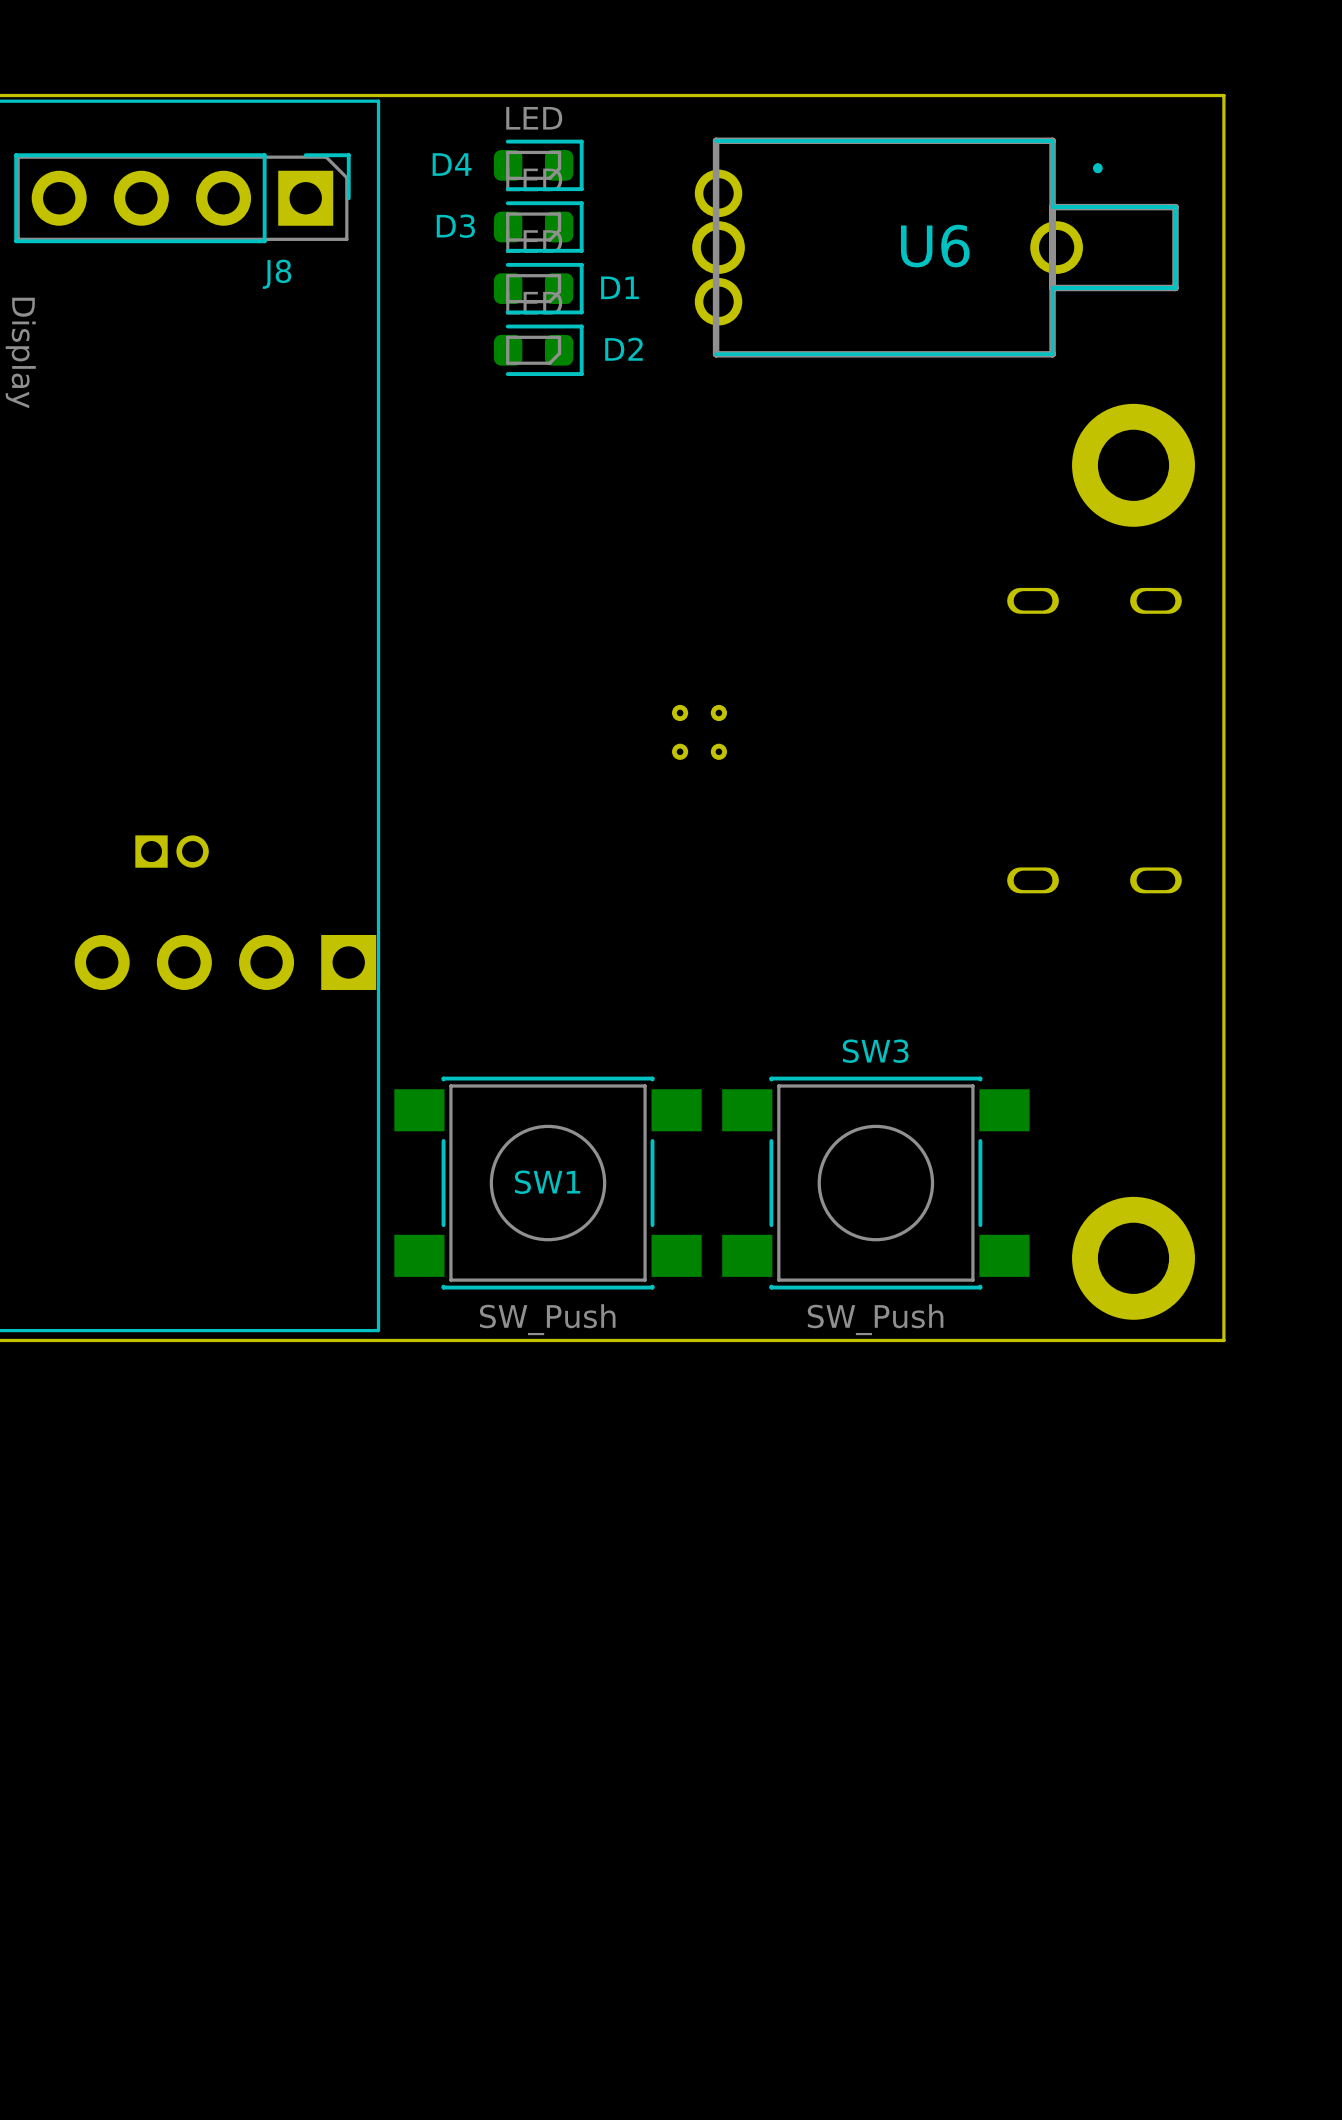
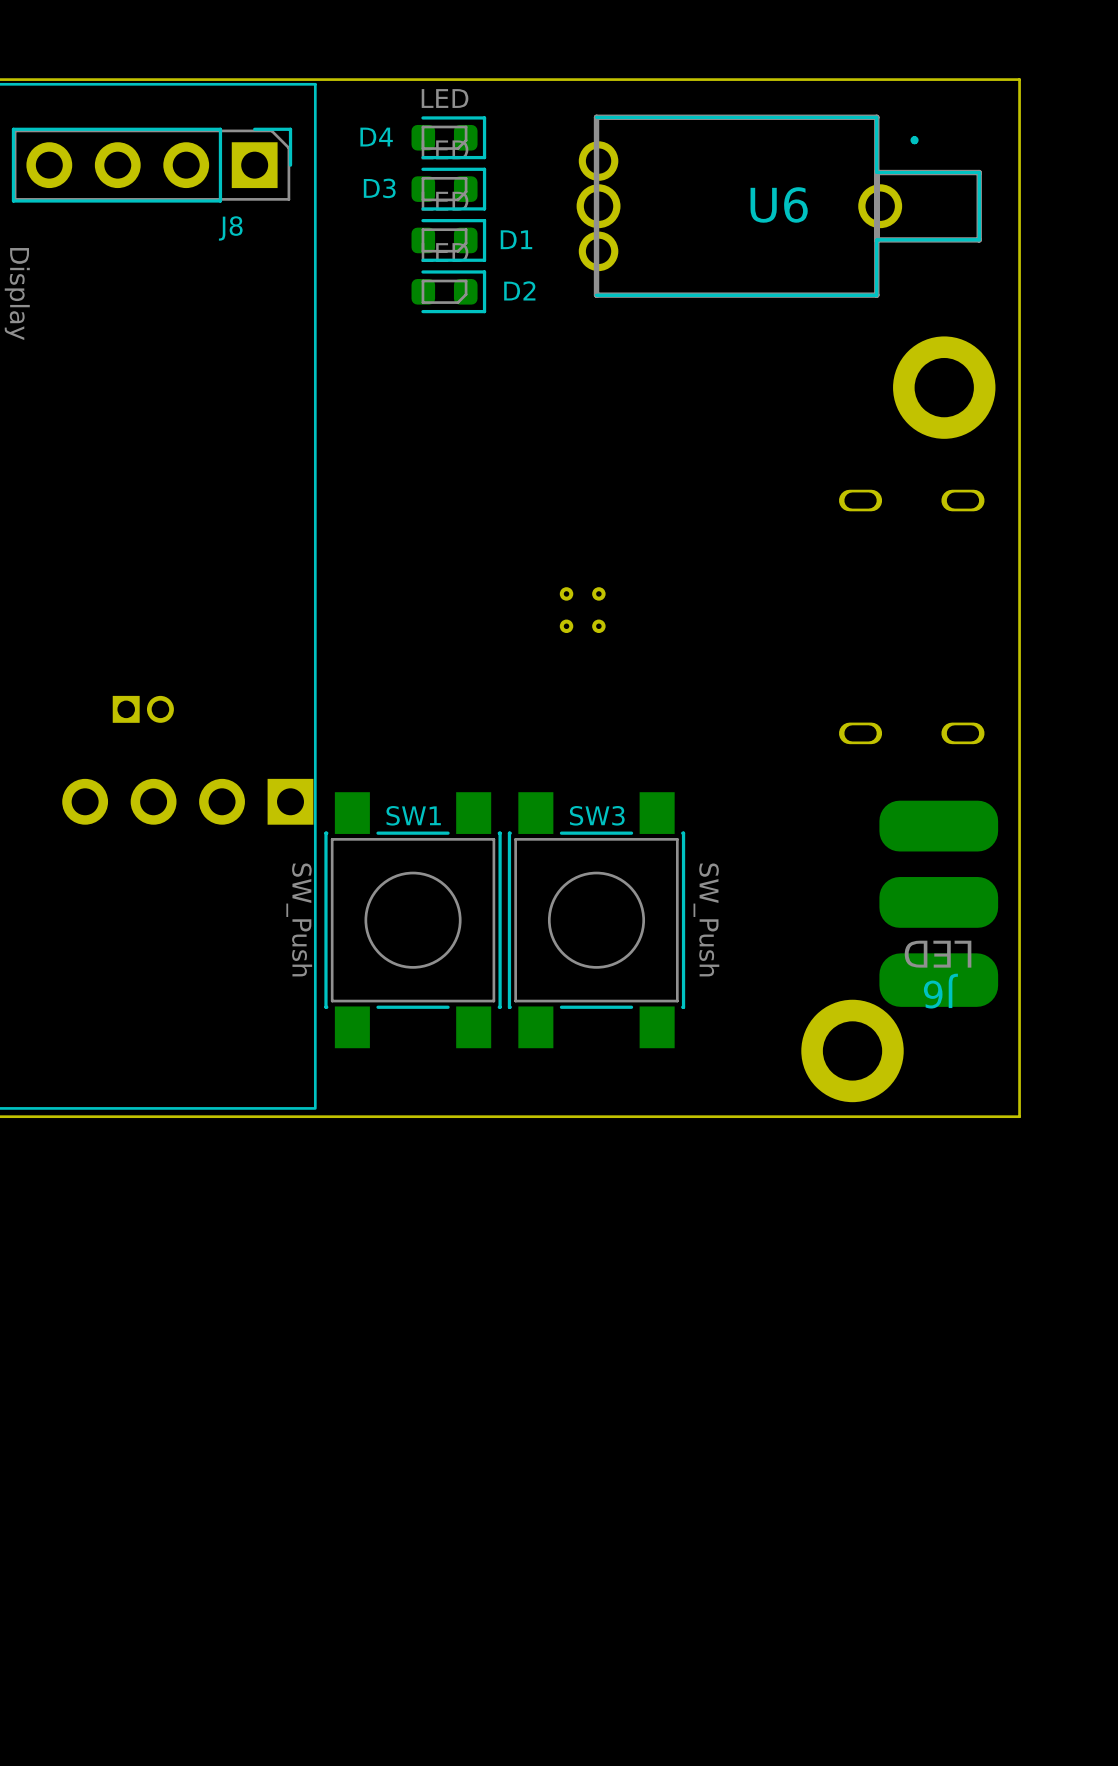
J6: none -> LED (938, 903)
SW1 name position: SW1 (547, 1182) -> SW1 (413, 815)
SW1 rotation: 0° (548, 1183) -> 90° clockwise (413, 920)
SW3 rotation: 0° (875, 1183) -> 90° clockwise (596, 920)
part position: (1133, 1258) -> (852, 1050)
SW3 value position: SW_Push (875, 1319) -> SW_Push (706, 919)

